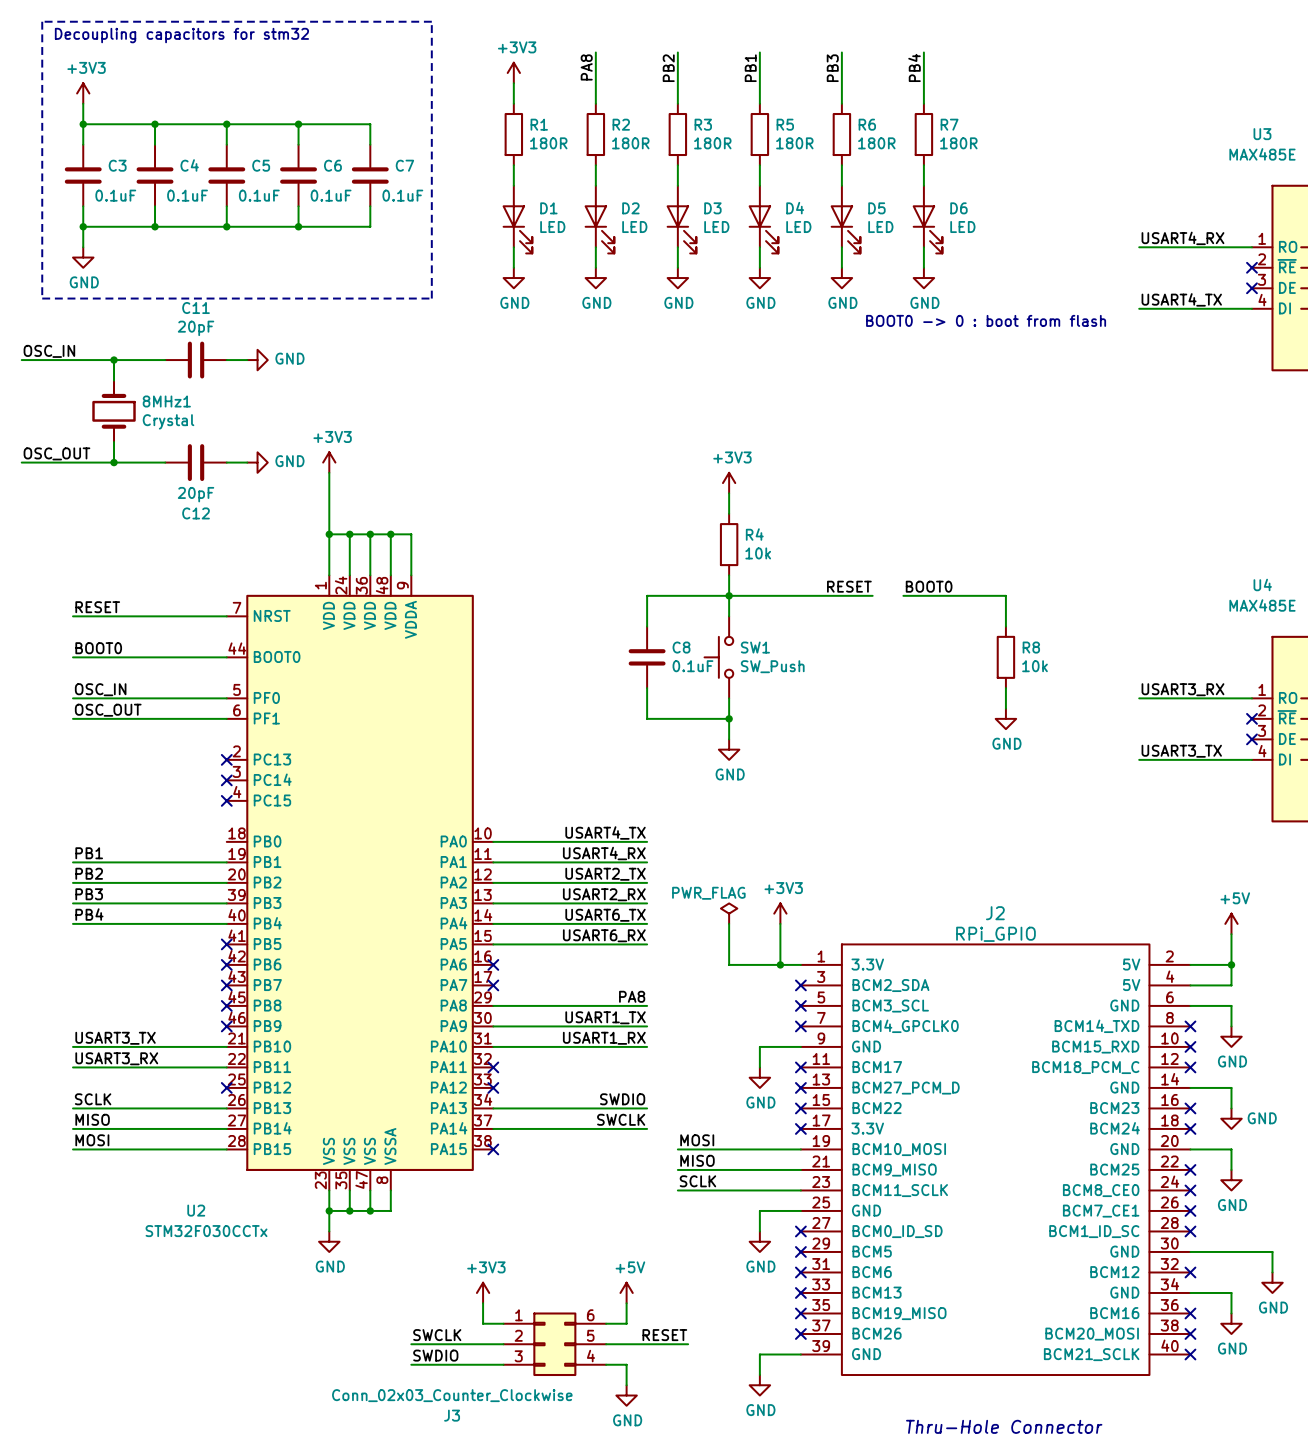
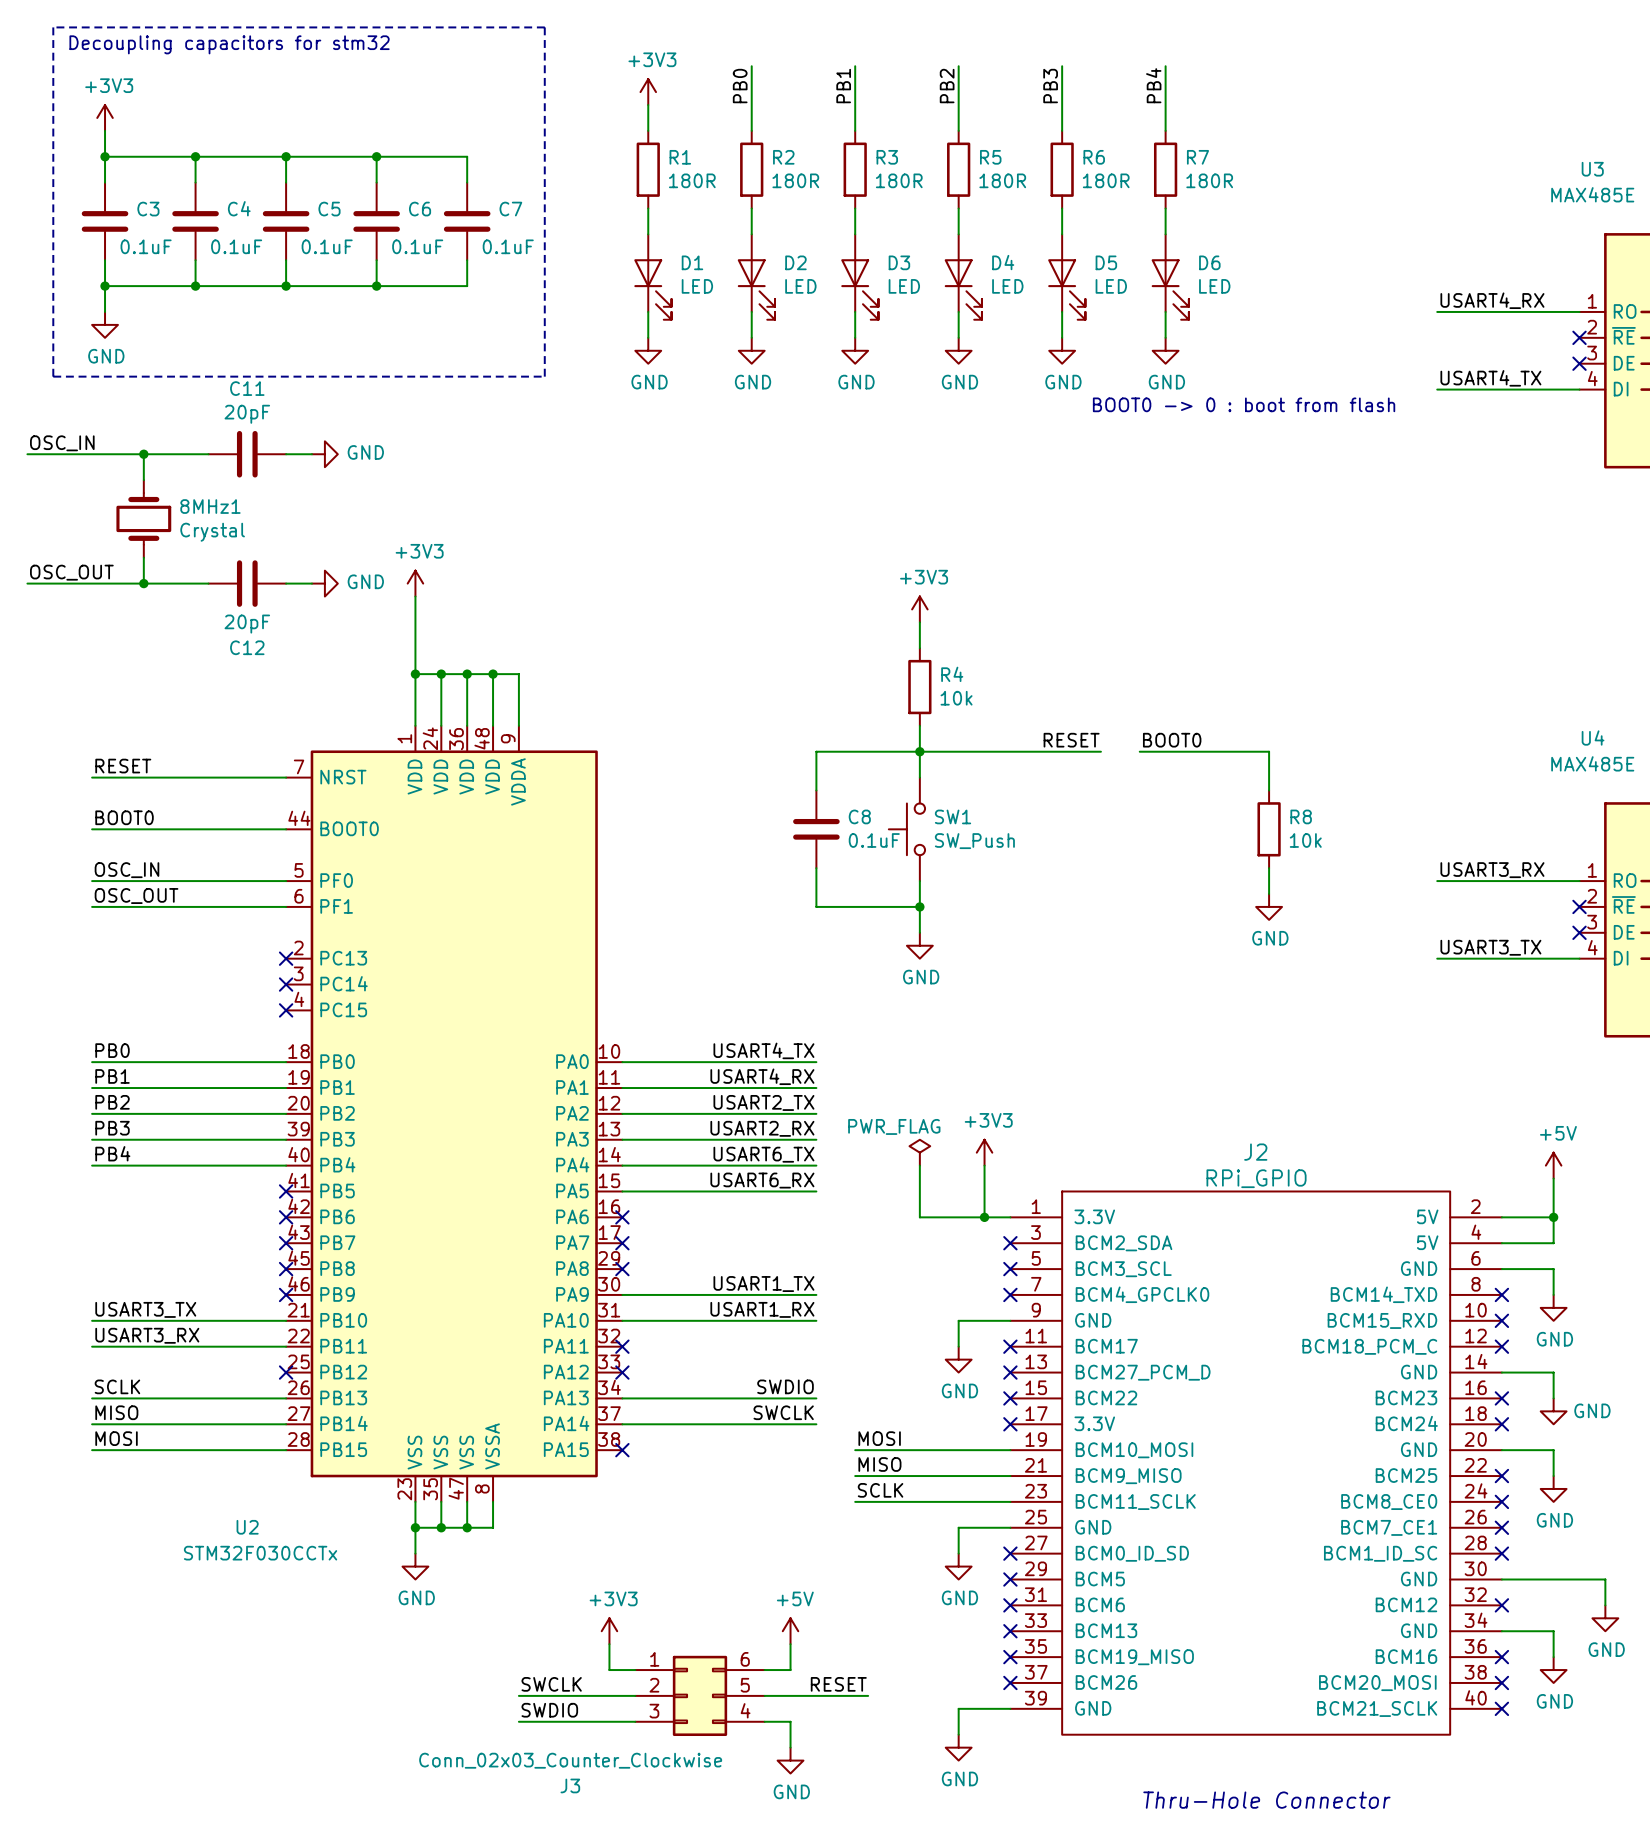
label: PA8 (586, 67) -> PB0 (740, 86)
label: PB2 (668, 68) -> PB1 (843, 86)
label: PB1 (750, 68) -> PB2 (947, 86)
label: none -> PB0 (112, 1050)
wire: none -> (92, 1062) (286, 1062)
label: PA8 (632, 996) -> none
wire: (493, 1005) (647, 1005) -> none
no-connect mark: none -> (622, 1269)

